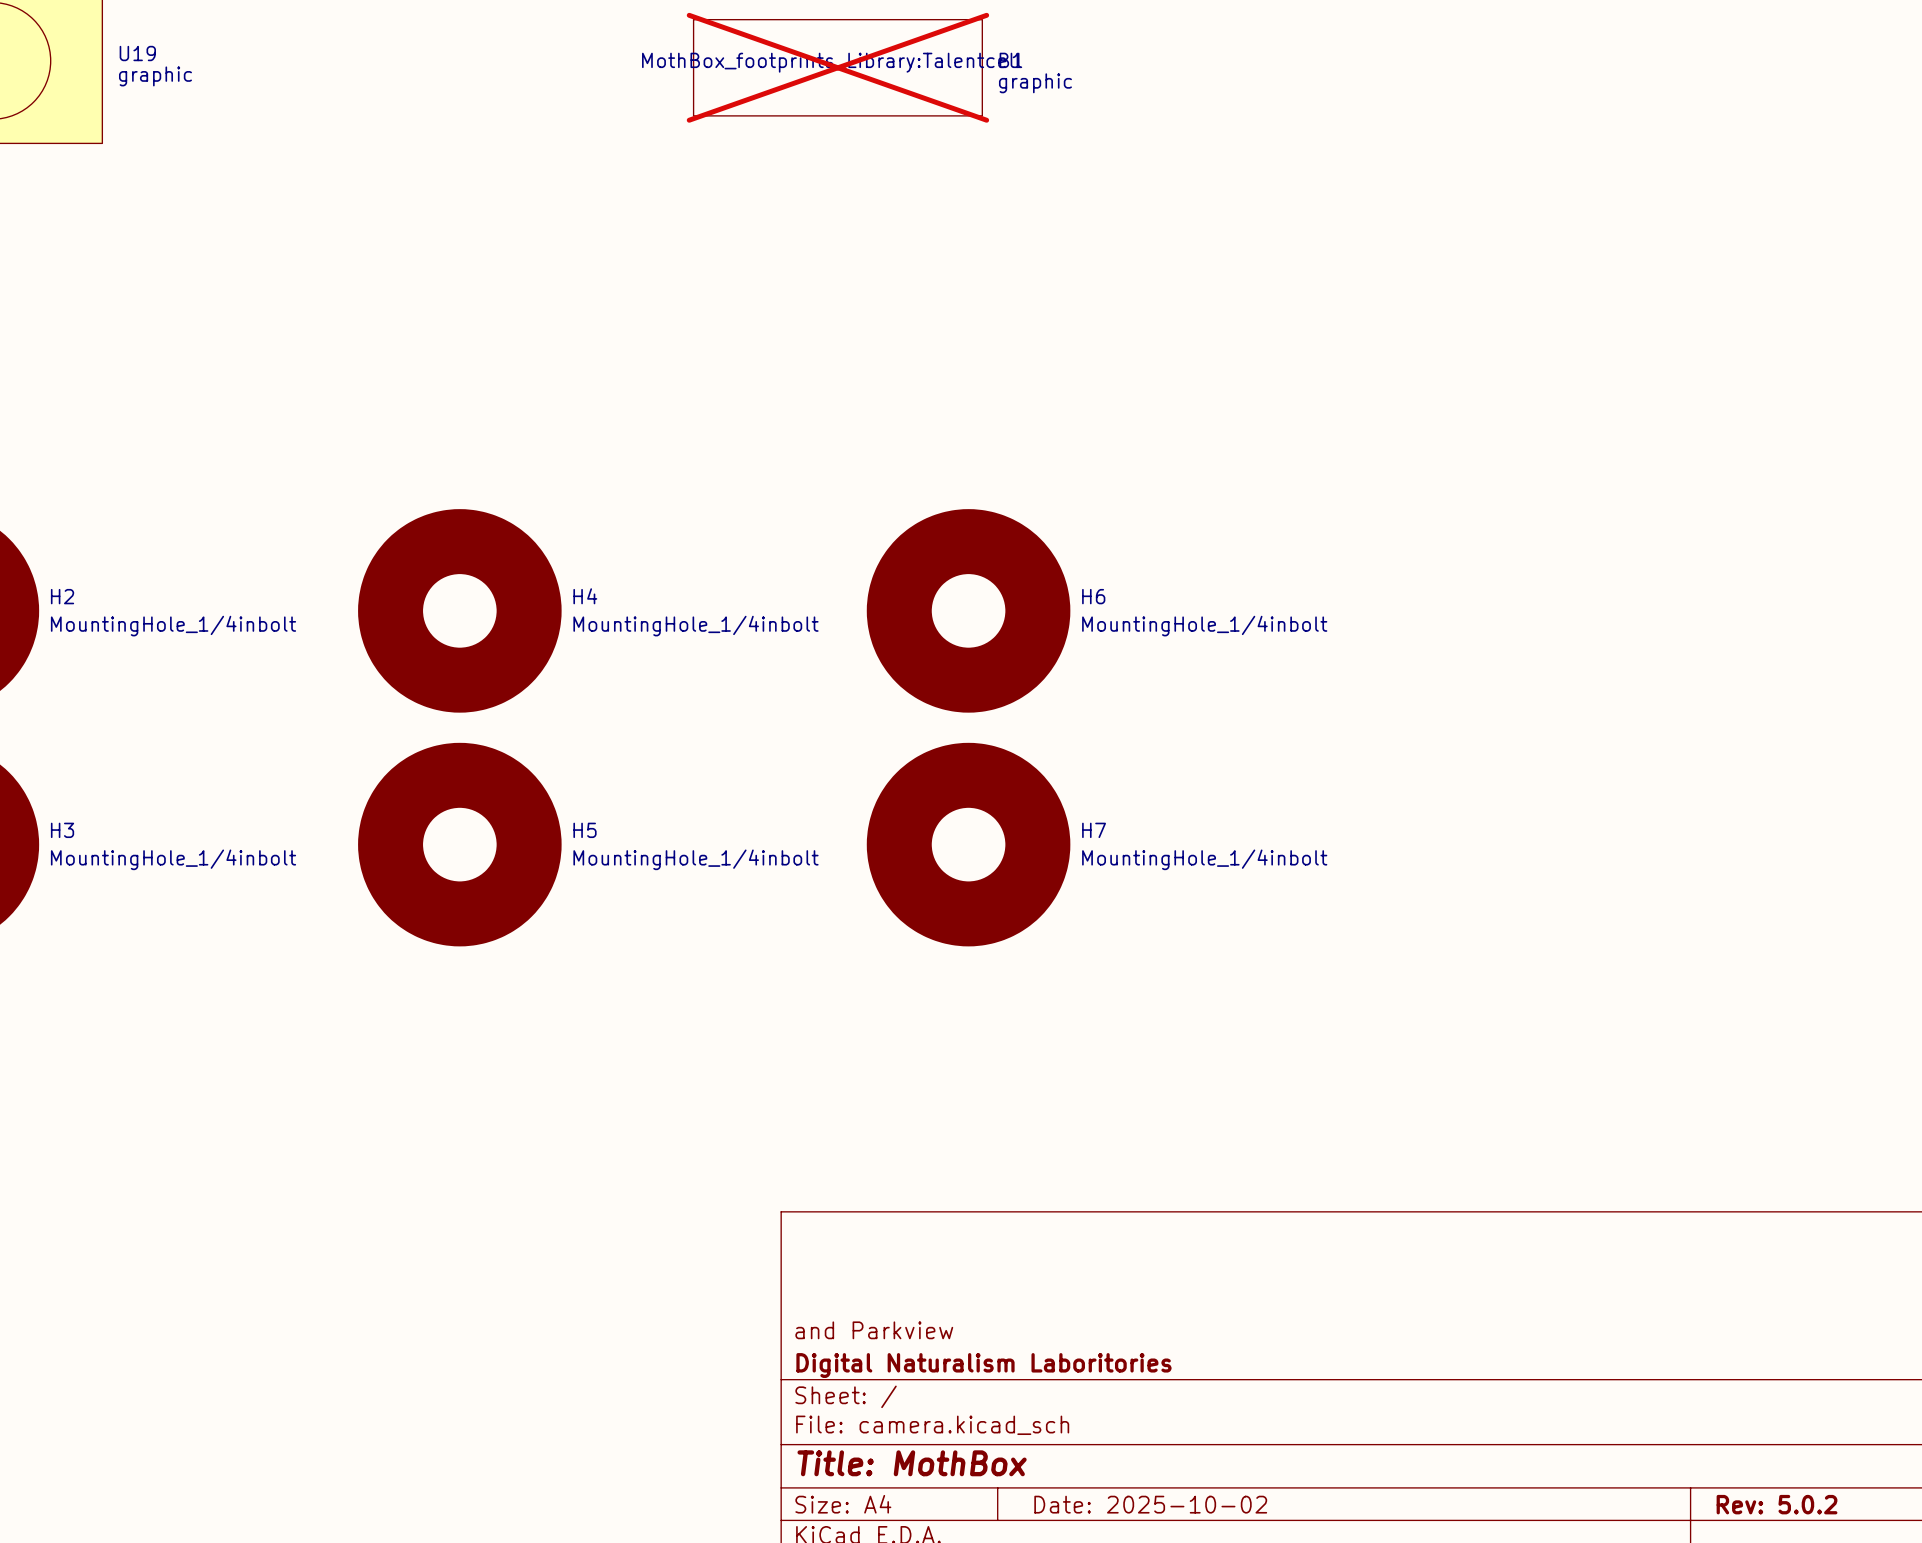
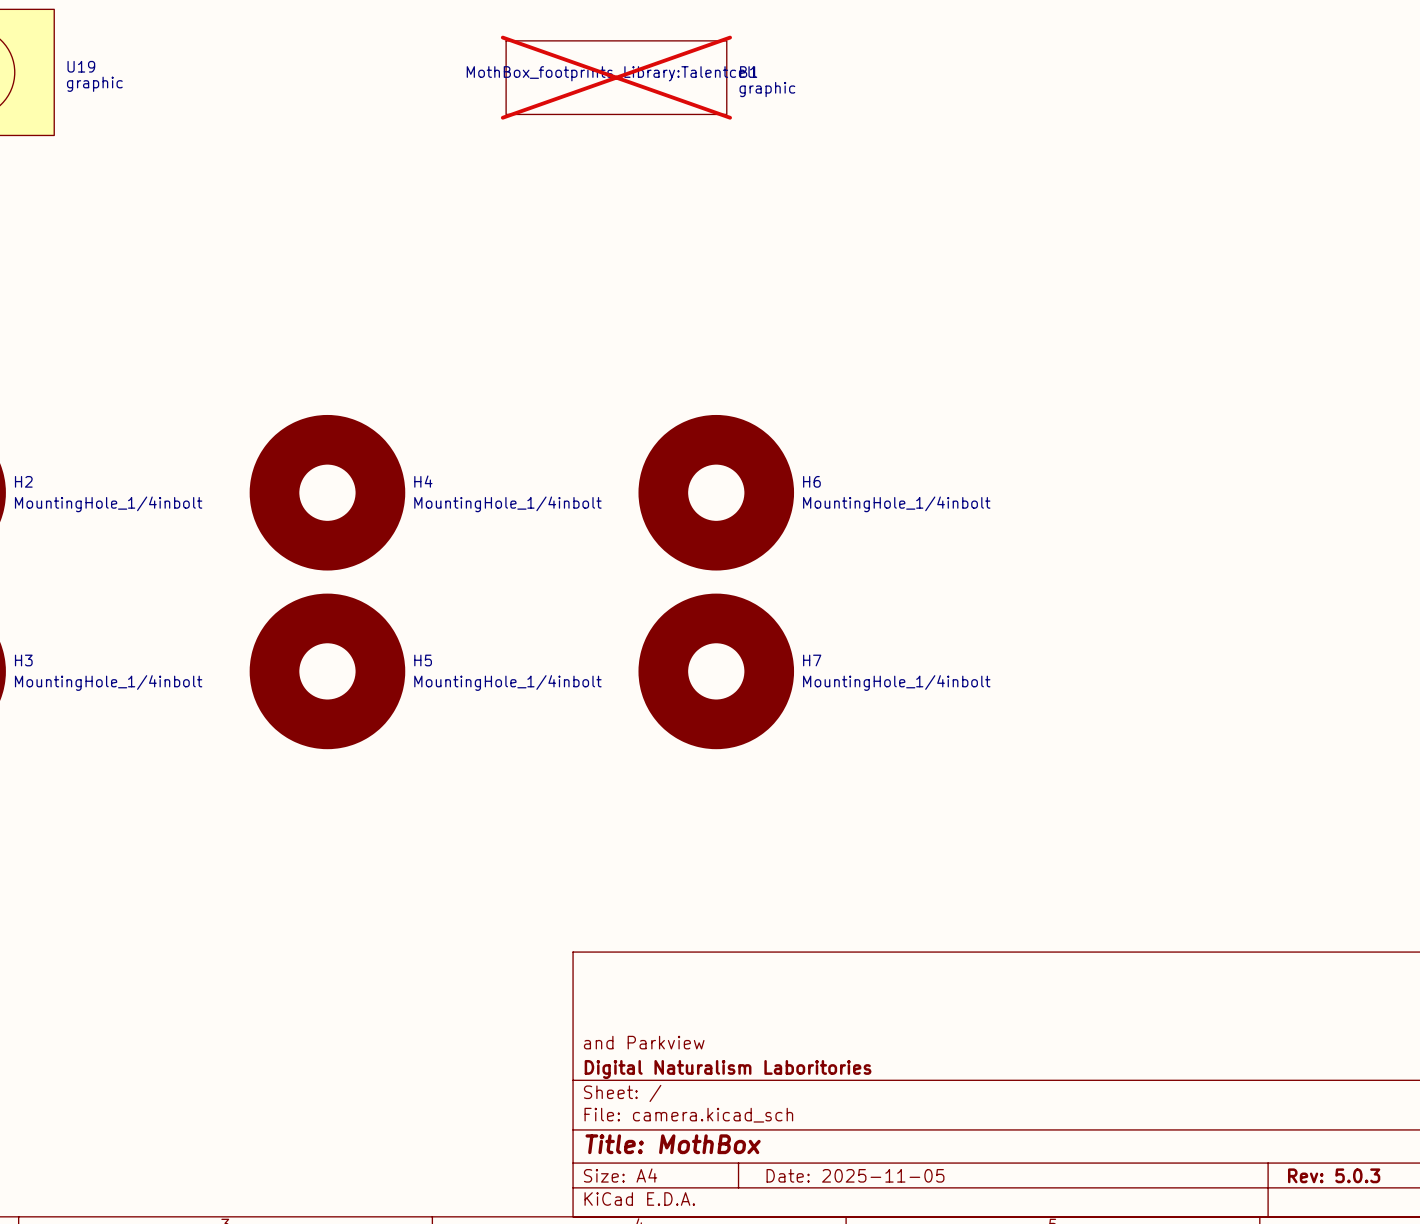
title block: Date: 2025-10-02 (1150, 1504) -> Date: 2025-11-05 (855, 1175)
title block: Rev: 5.0.2 (1777, 1504) -> Rev: 5.0.3 (1334, 1175)

